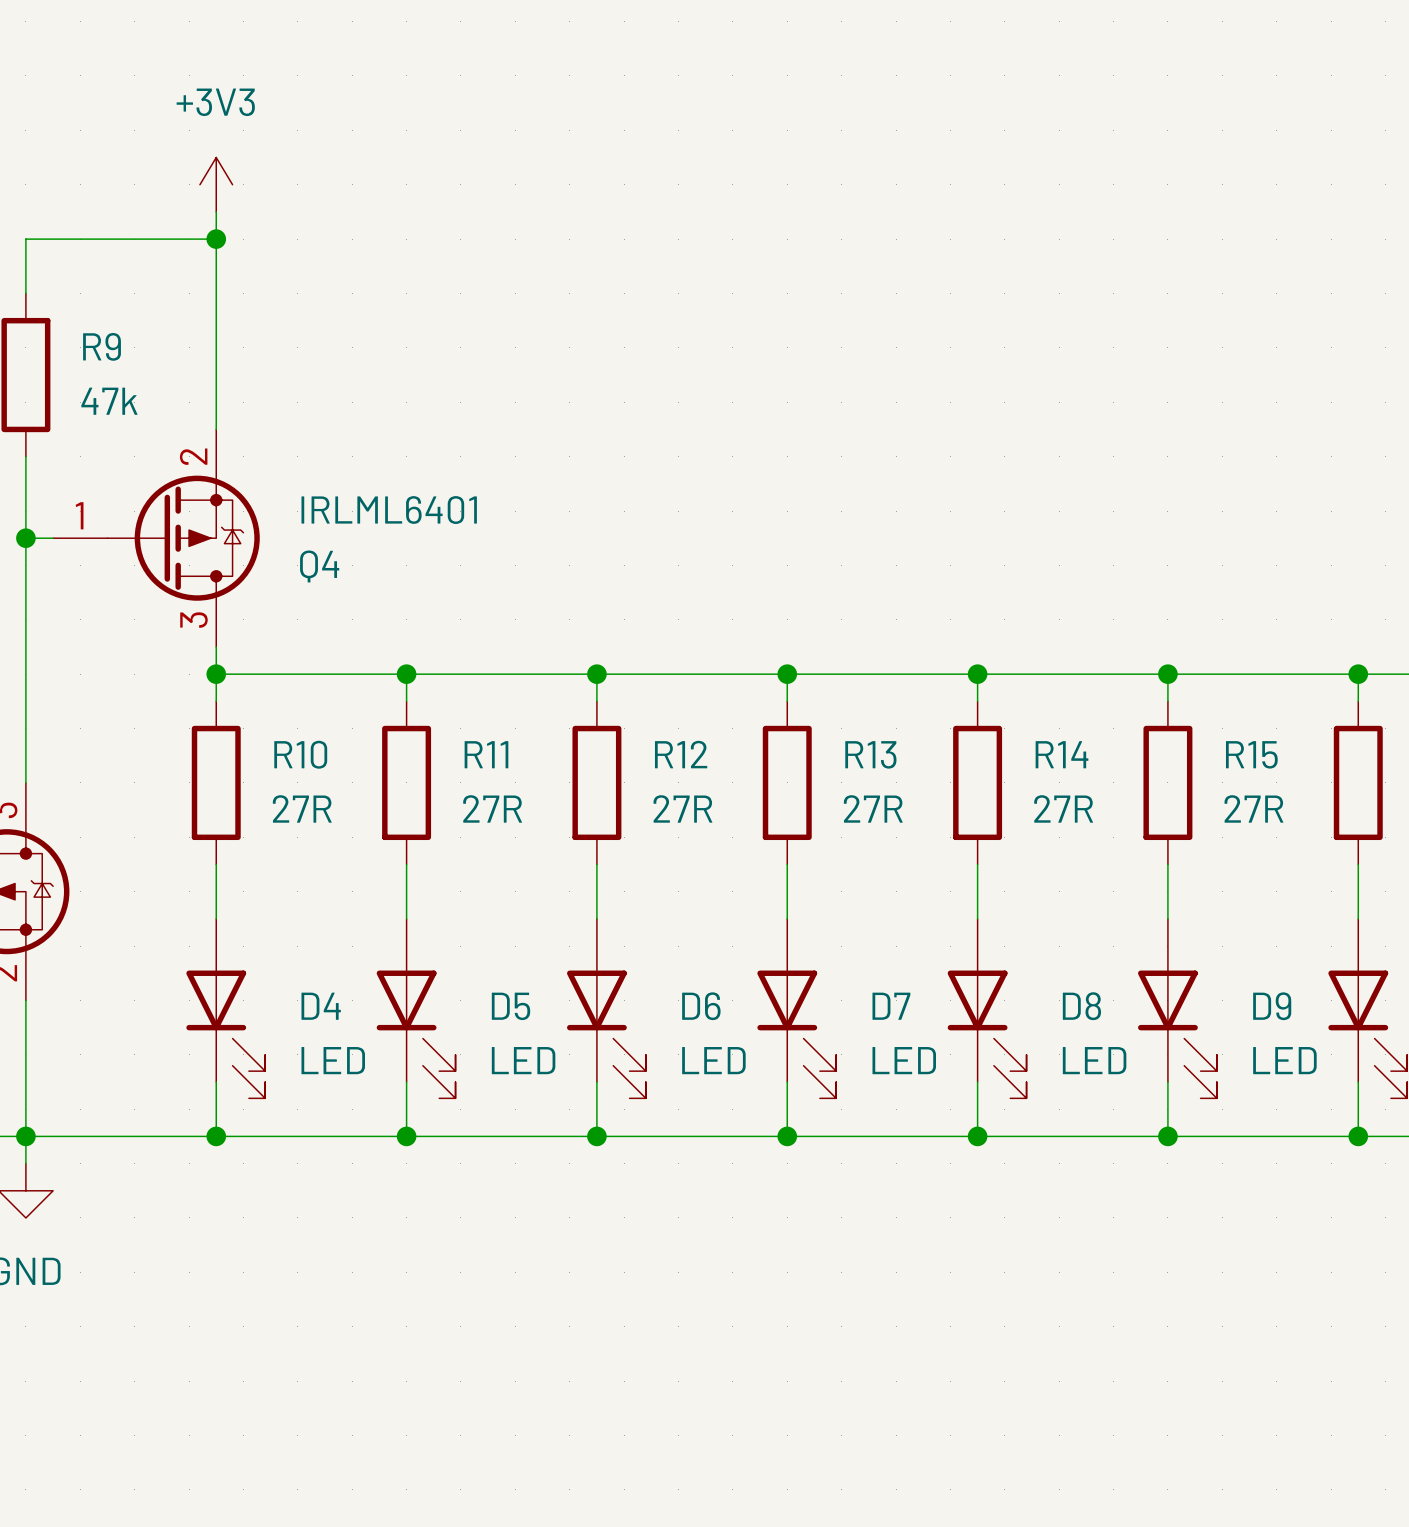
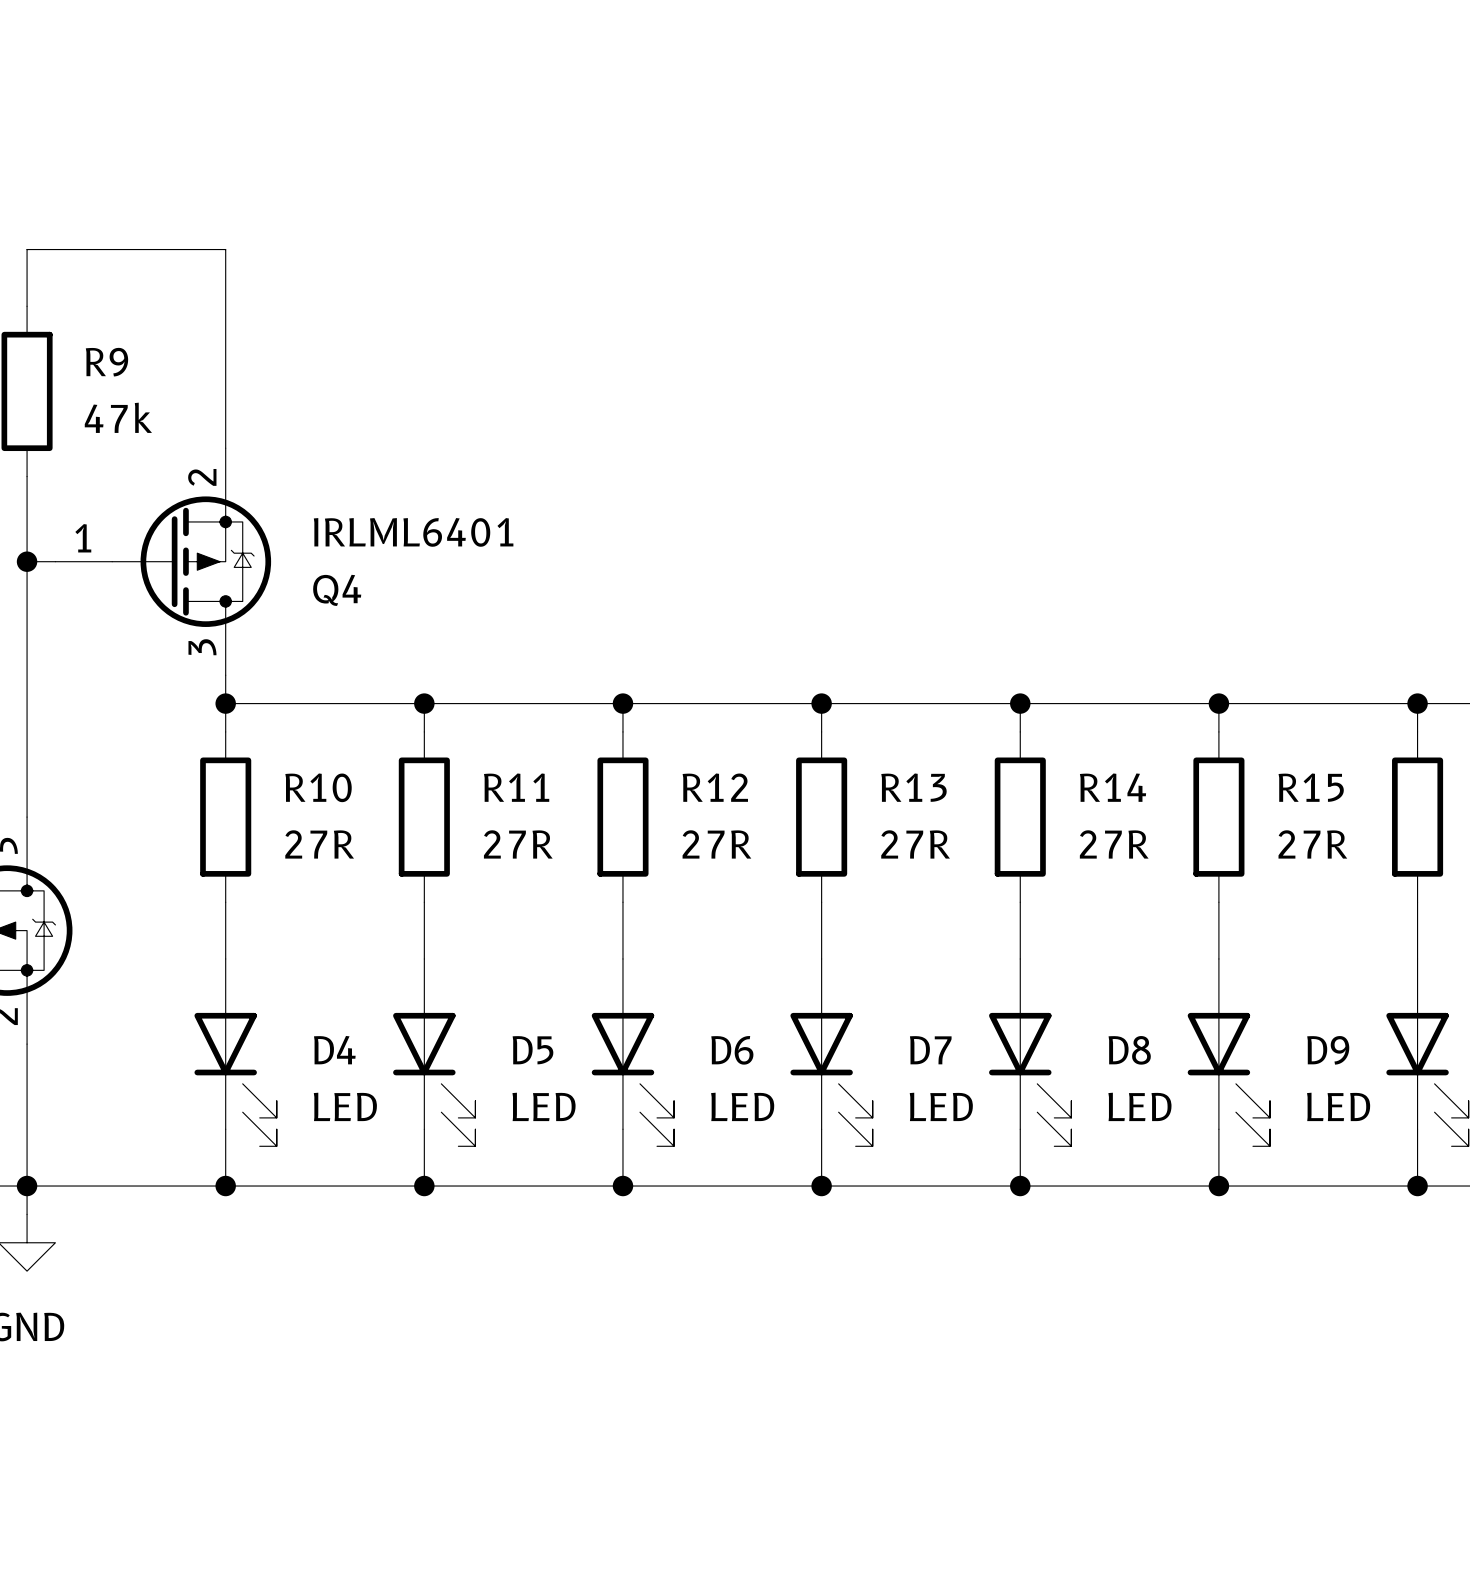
power symbol: +3V3 (216, 184) -> none
wire: (216, 211) (216, 239) -> none
junction: (216, 239) -> none

